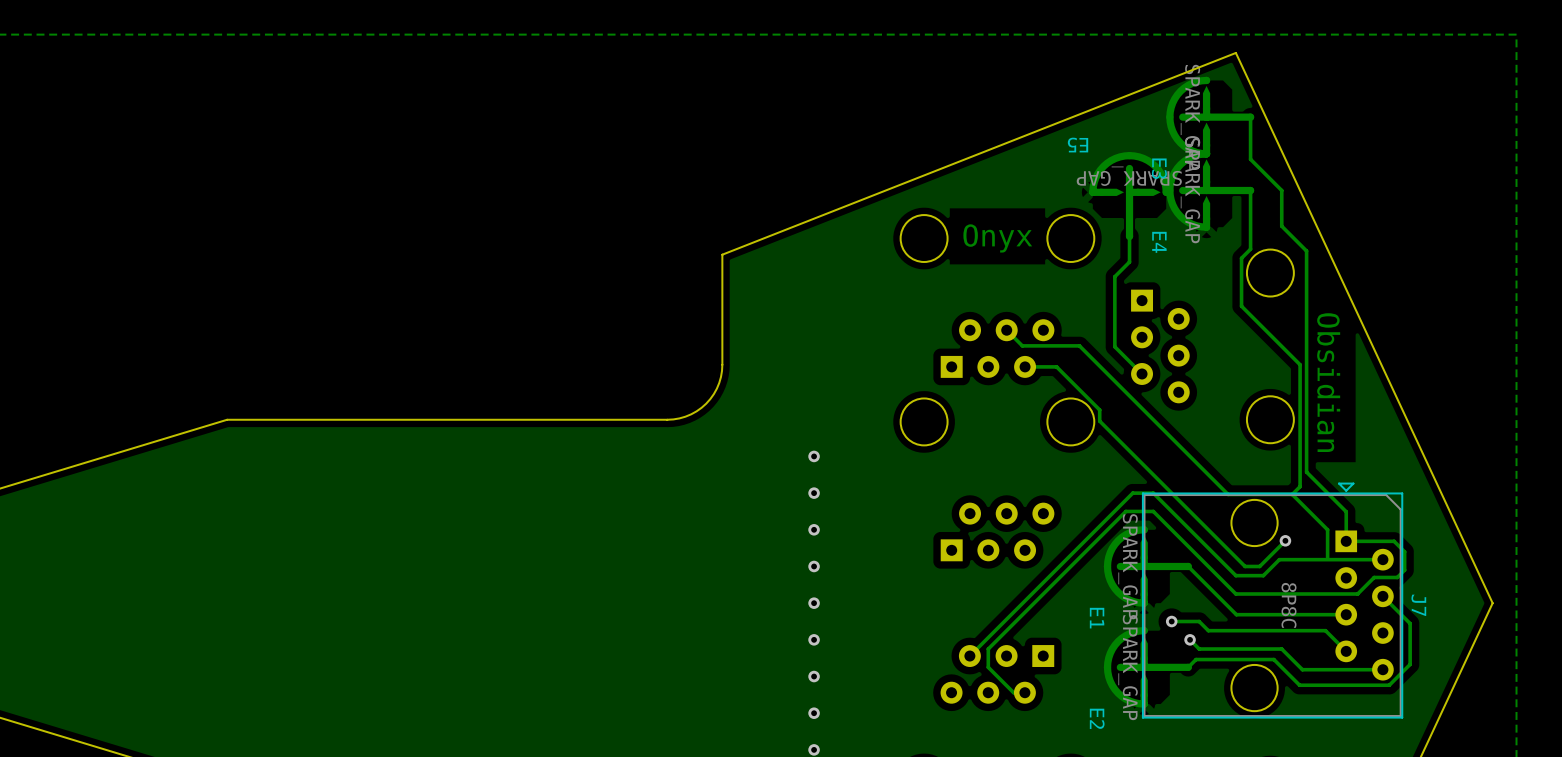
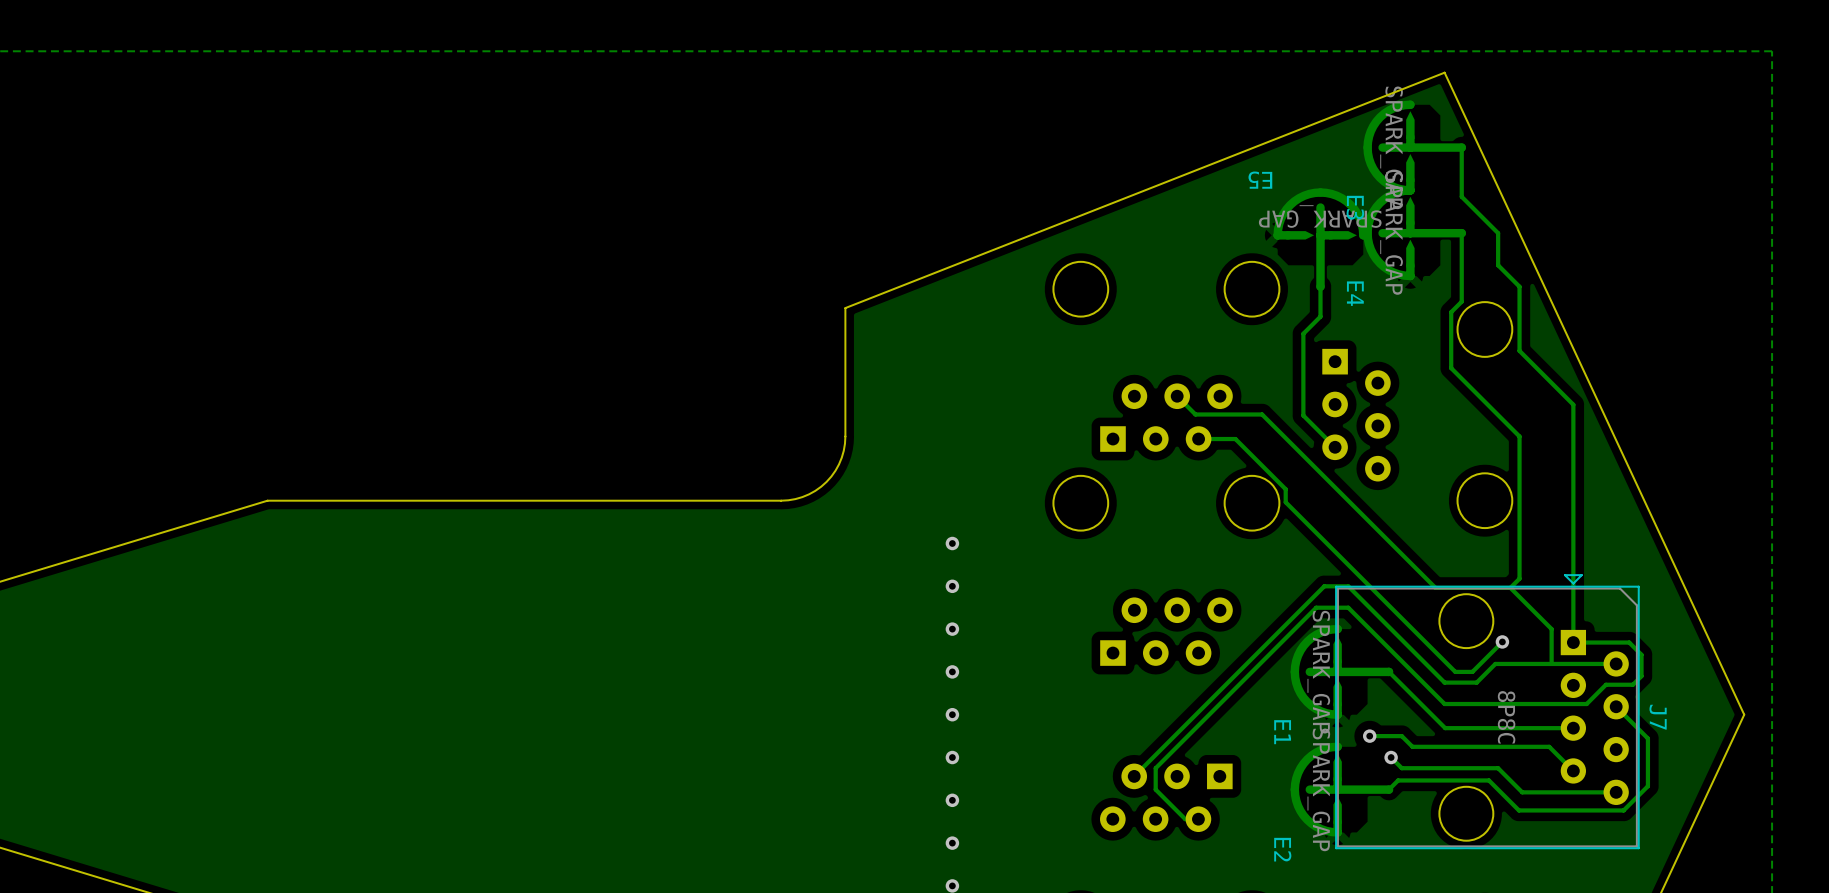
track: (1281, 218) (1281, 226) (1306, 251) (1306, 472) (1346, 511) -> (1498, 265) (1519, 286) (1519, 350) (1573, 404) (1573, 608)
text: Onyx (997, 238) -> none
text: Obsidian (1328, 382) -> none

